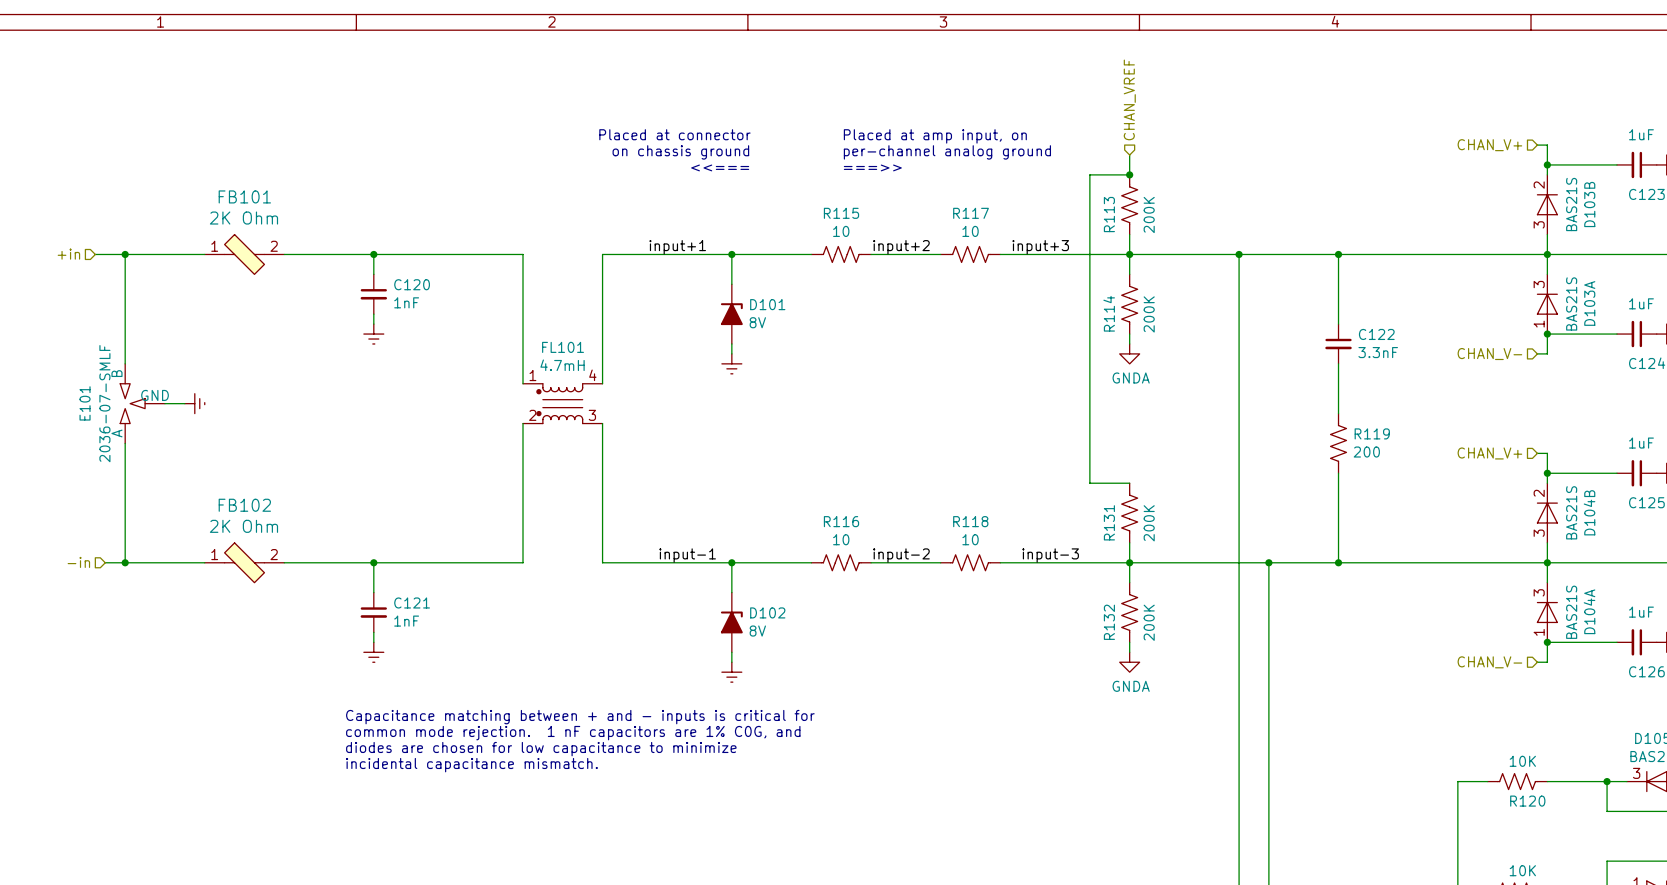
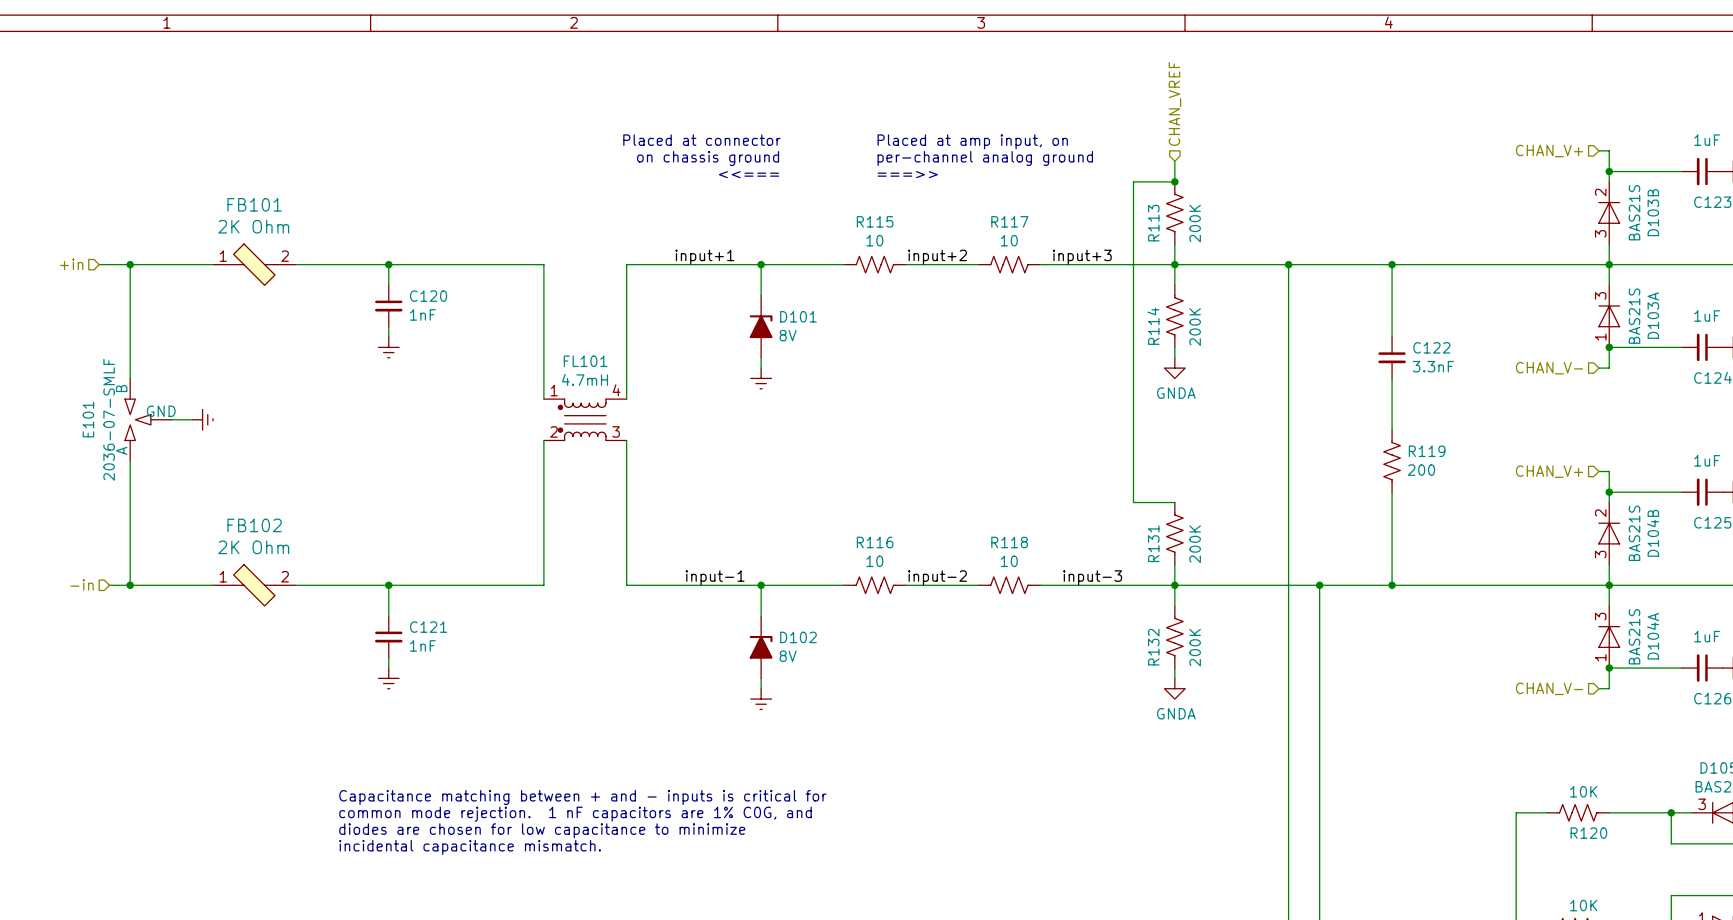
text position: Capacitance matching between + and - inputs is critical for (580, 717) -> Capacitance matching between + and - inputs is critical for (582, 797)
text position: common mode rejection. 1 nF capacitors are 1% C0G, and (573, 733) -> common mode rejection. 1 nF capacitors are 1% C0G, and (575, 814)
text position: diodes are chosen for low capacitance to minimize (541, 749) -> diodes are chosen for low capacitance to minimize (542, 830)
text position: incidental capacitance mismatch. (471, 765) -> incidental capacitance mismatch. (470, 847)

